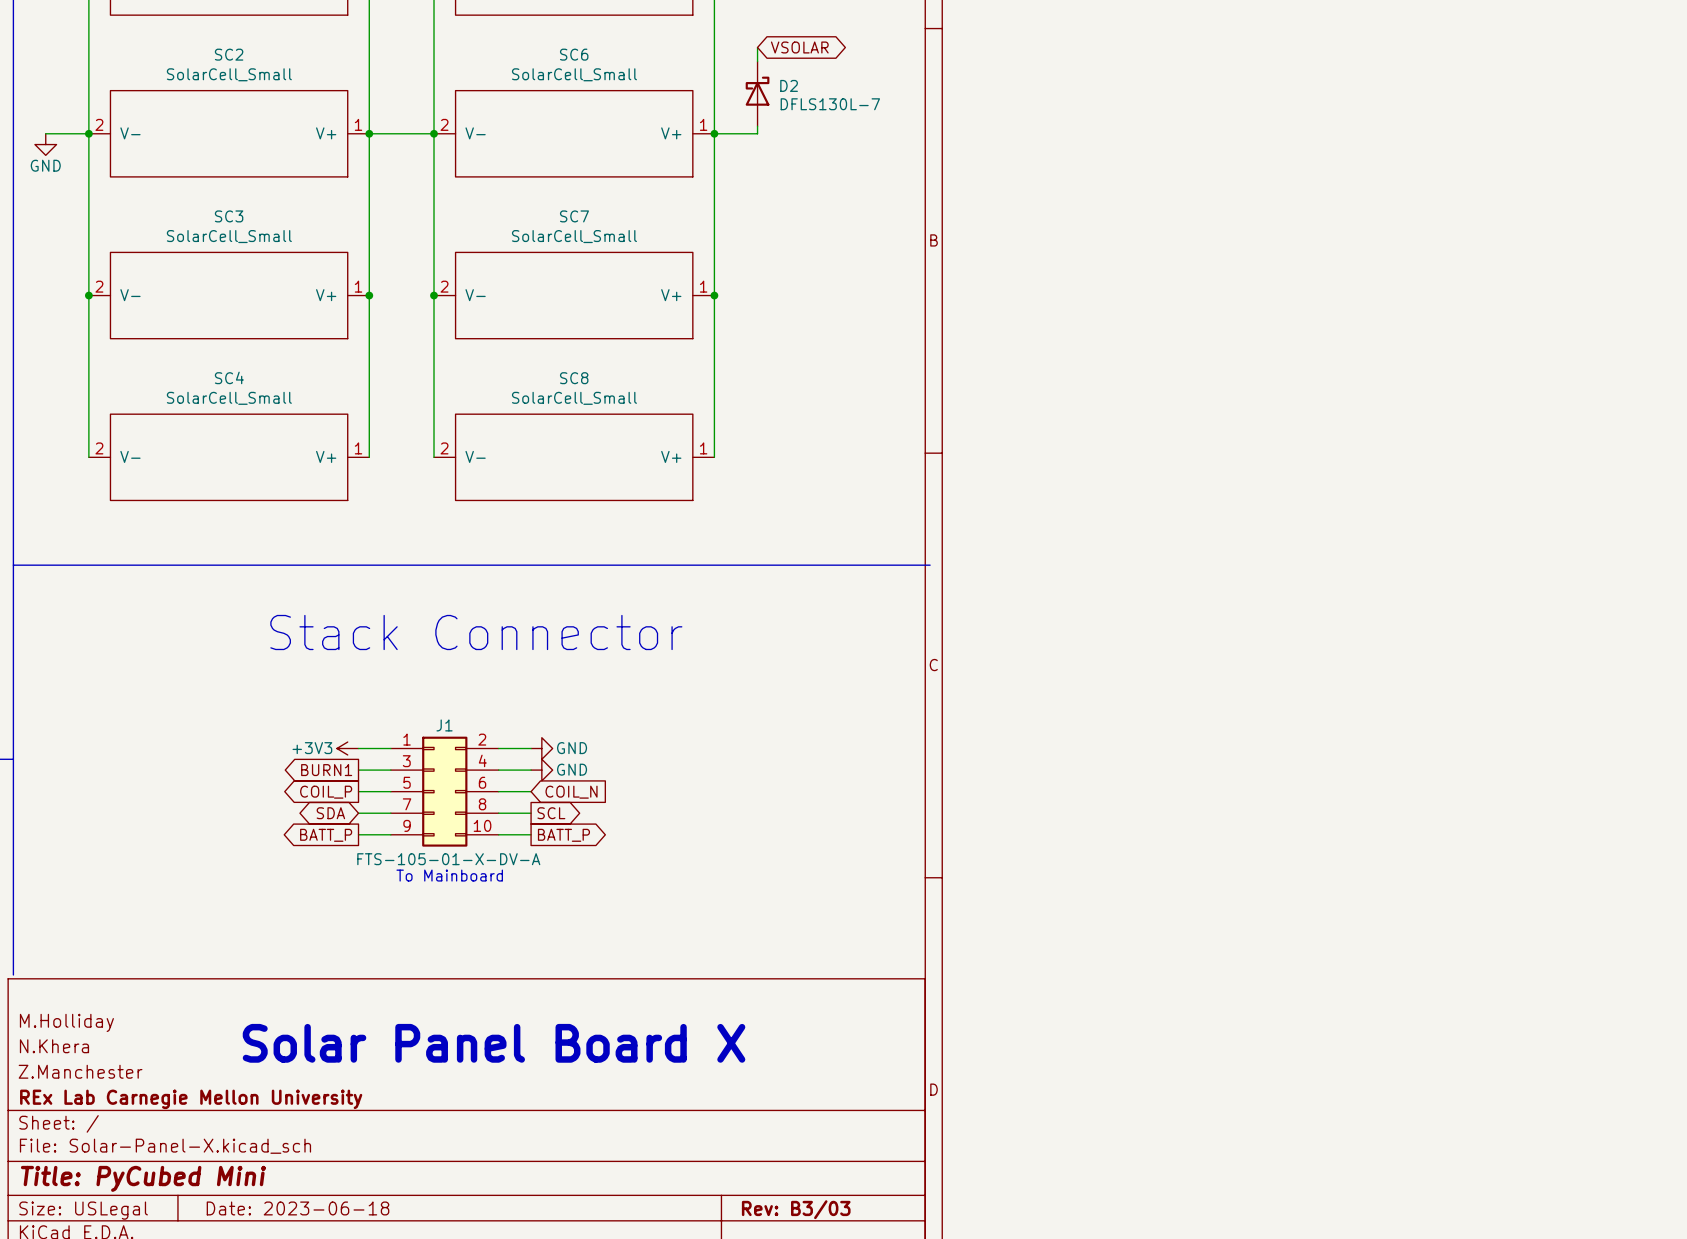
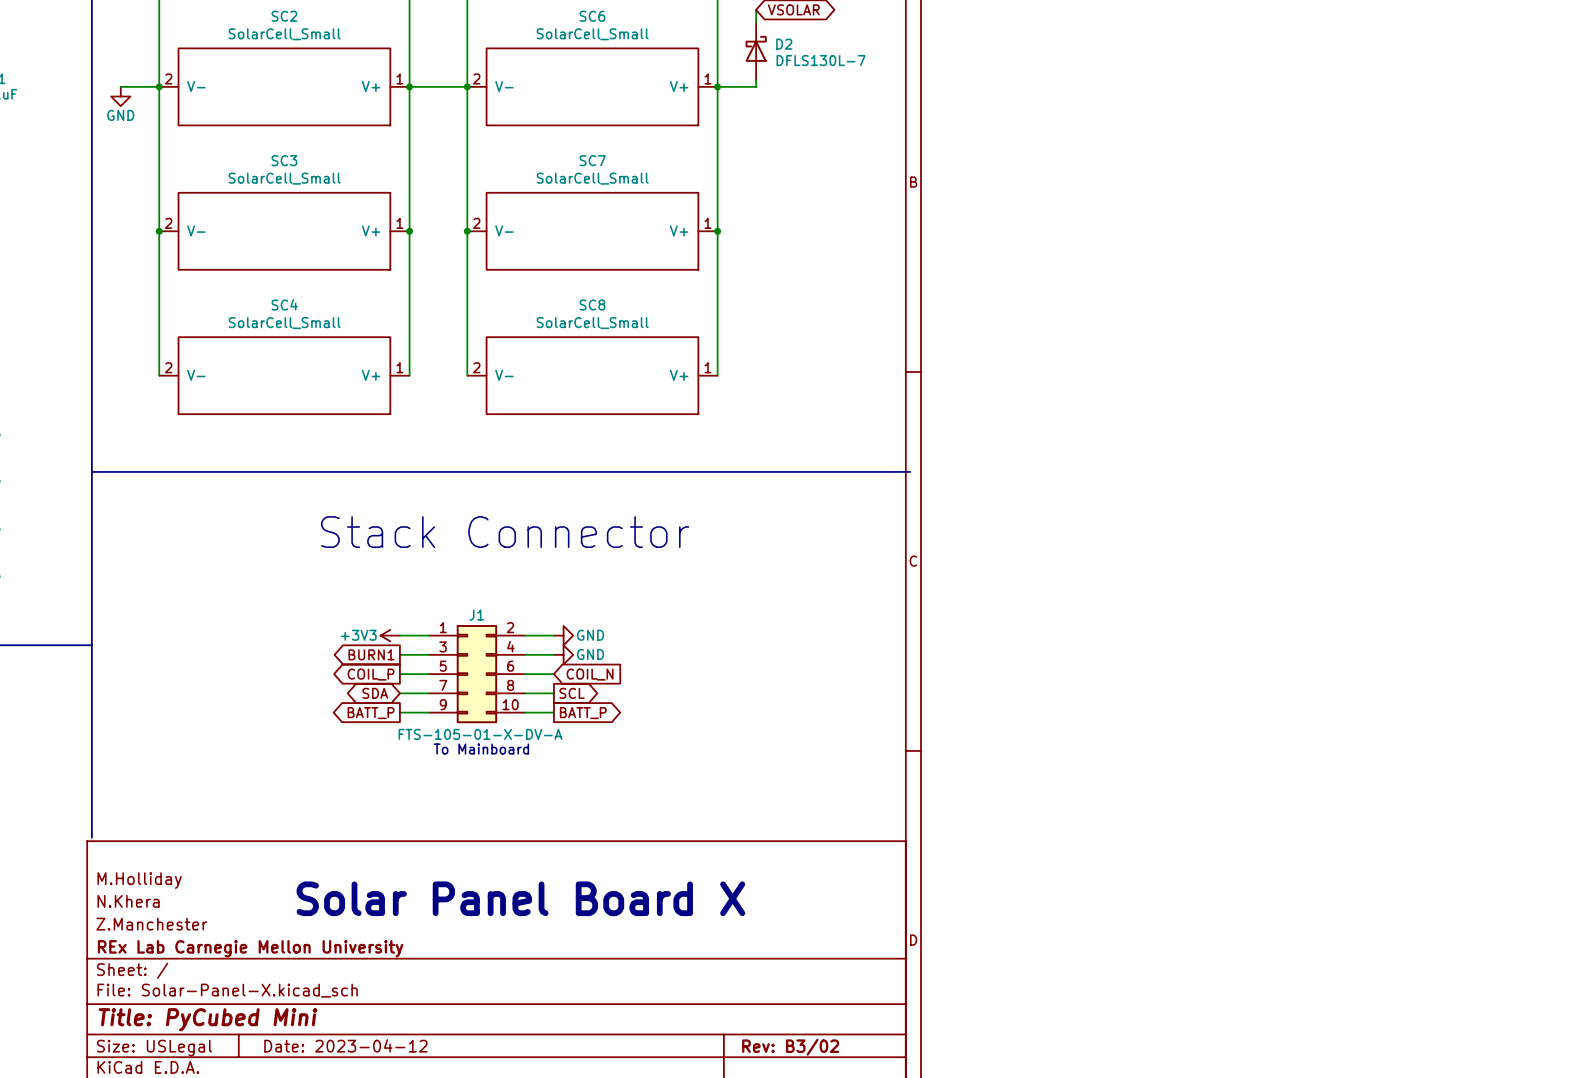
title block: Date: 2023-06-18 (298, 1208) -> Date: 2023-04-12 (345, 1045)
title block: Rev: B3/03 (796, 1209) -> Rev: B3/02 (790, 1047)

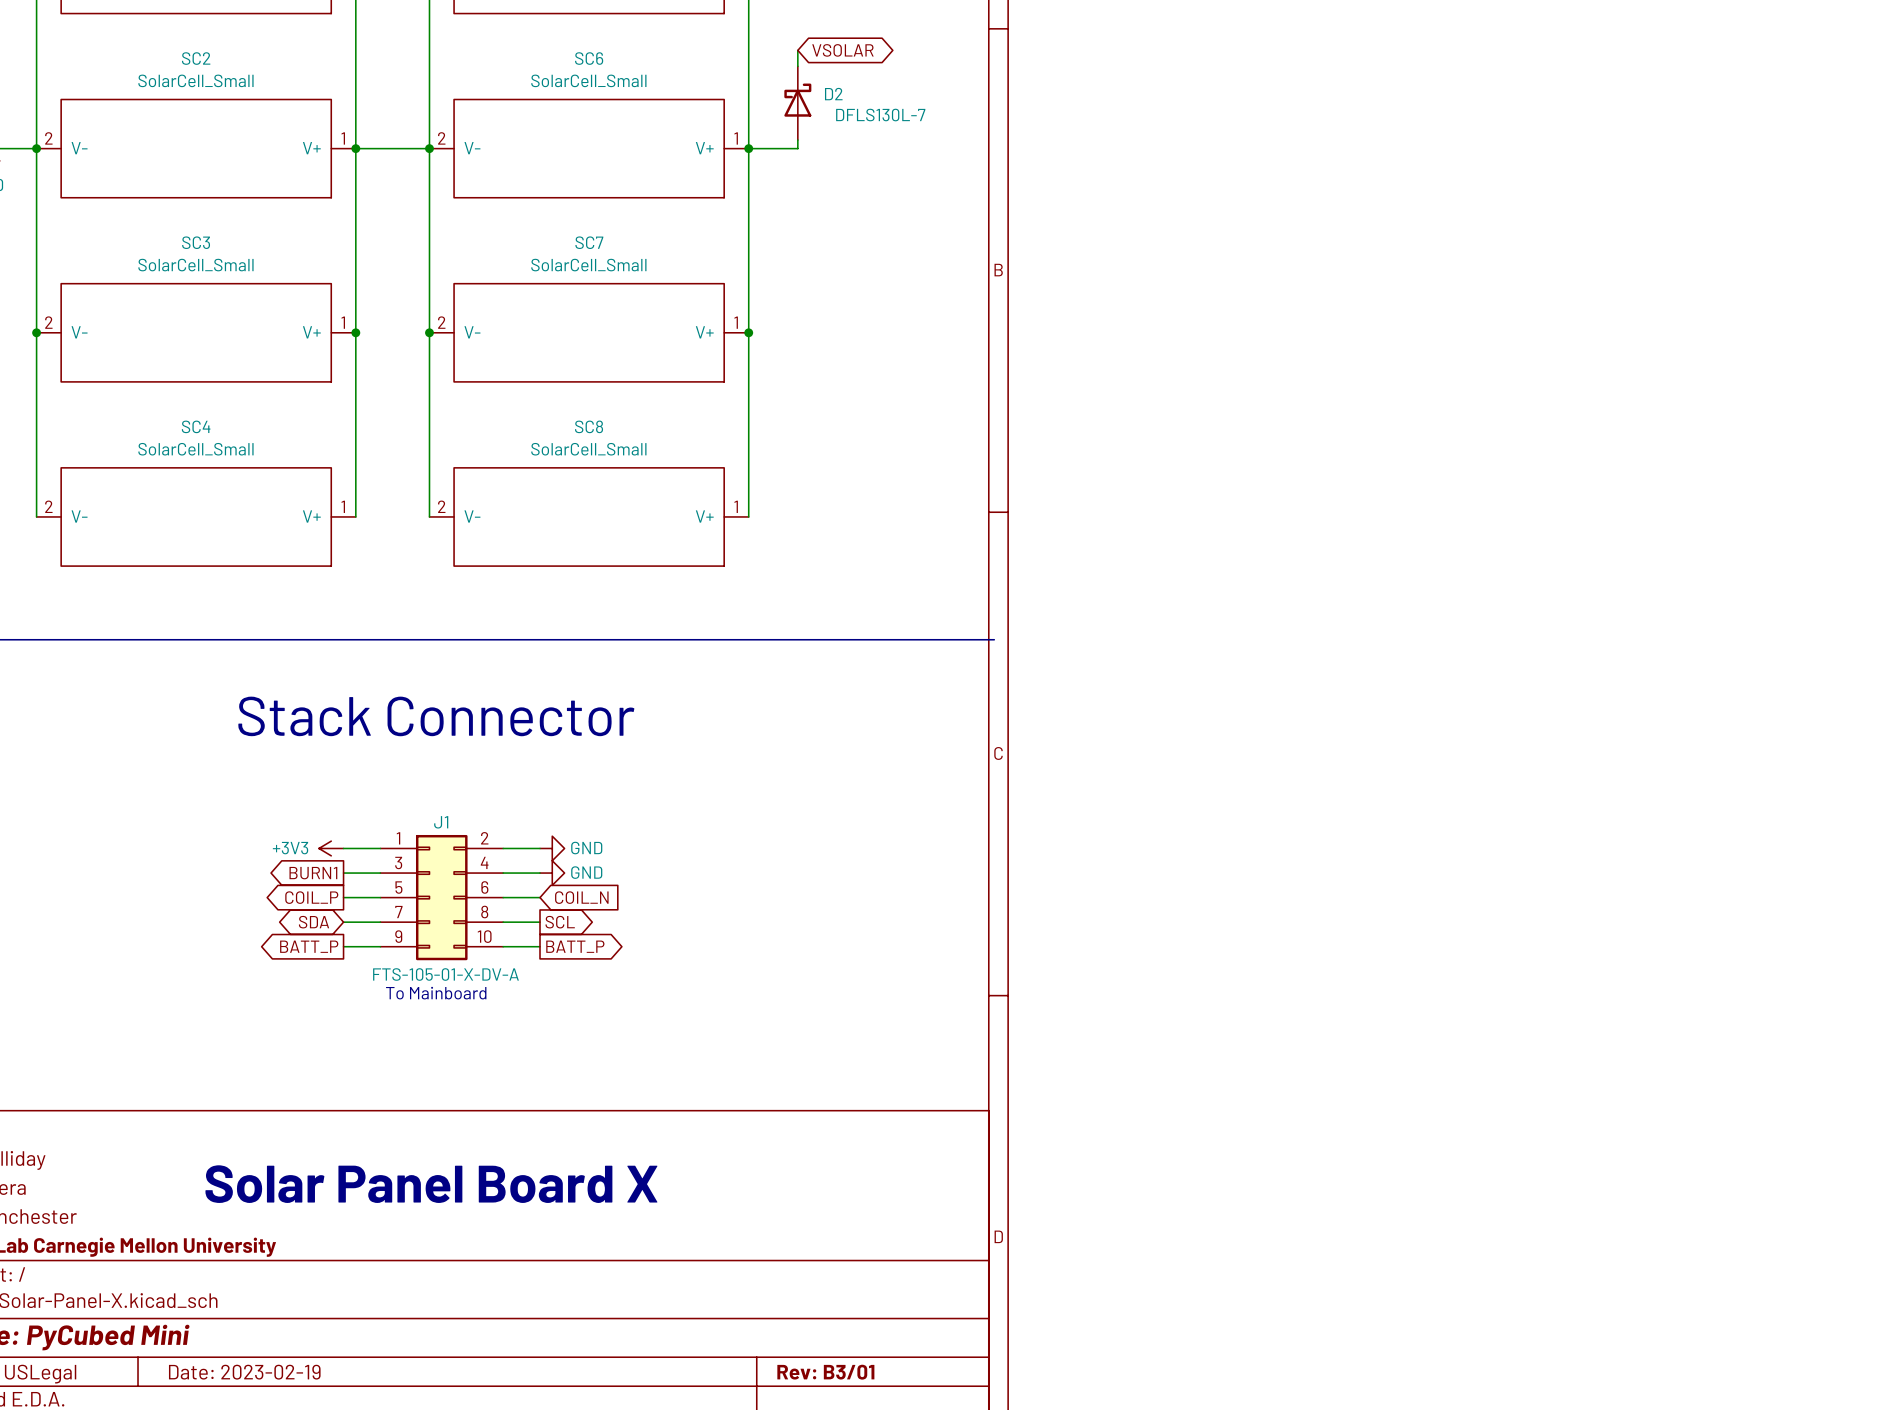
title block: Date: 2023-04-12 (345, 1045) -> Date: 2023-02-19 (244, 1372)
title block: Rev: B3/02 (790, 1047) -> Rev: B3/01 (825, 1372)

